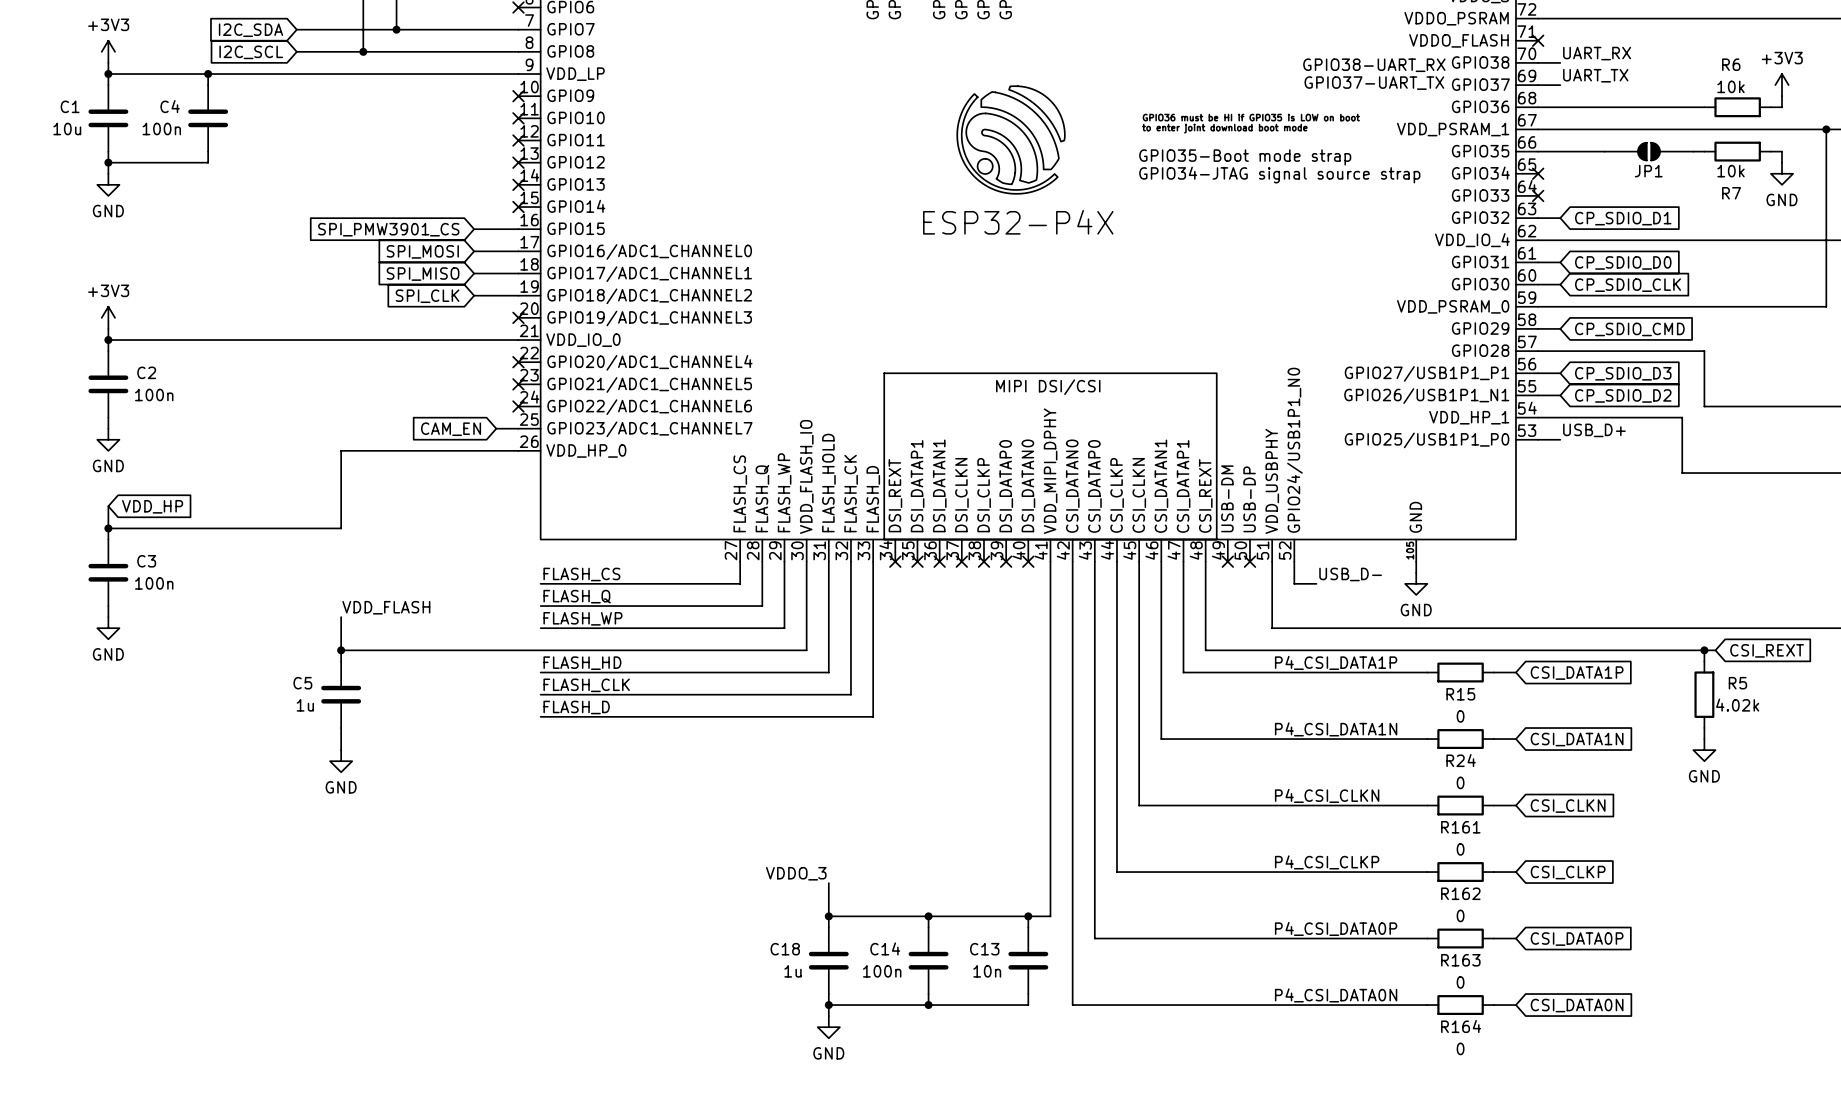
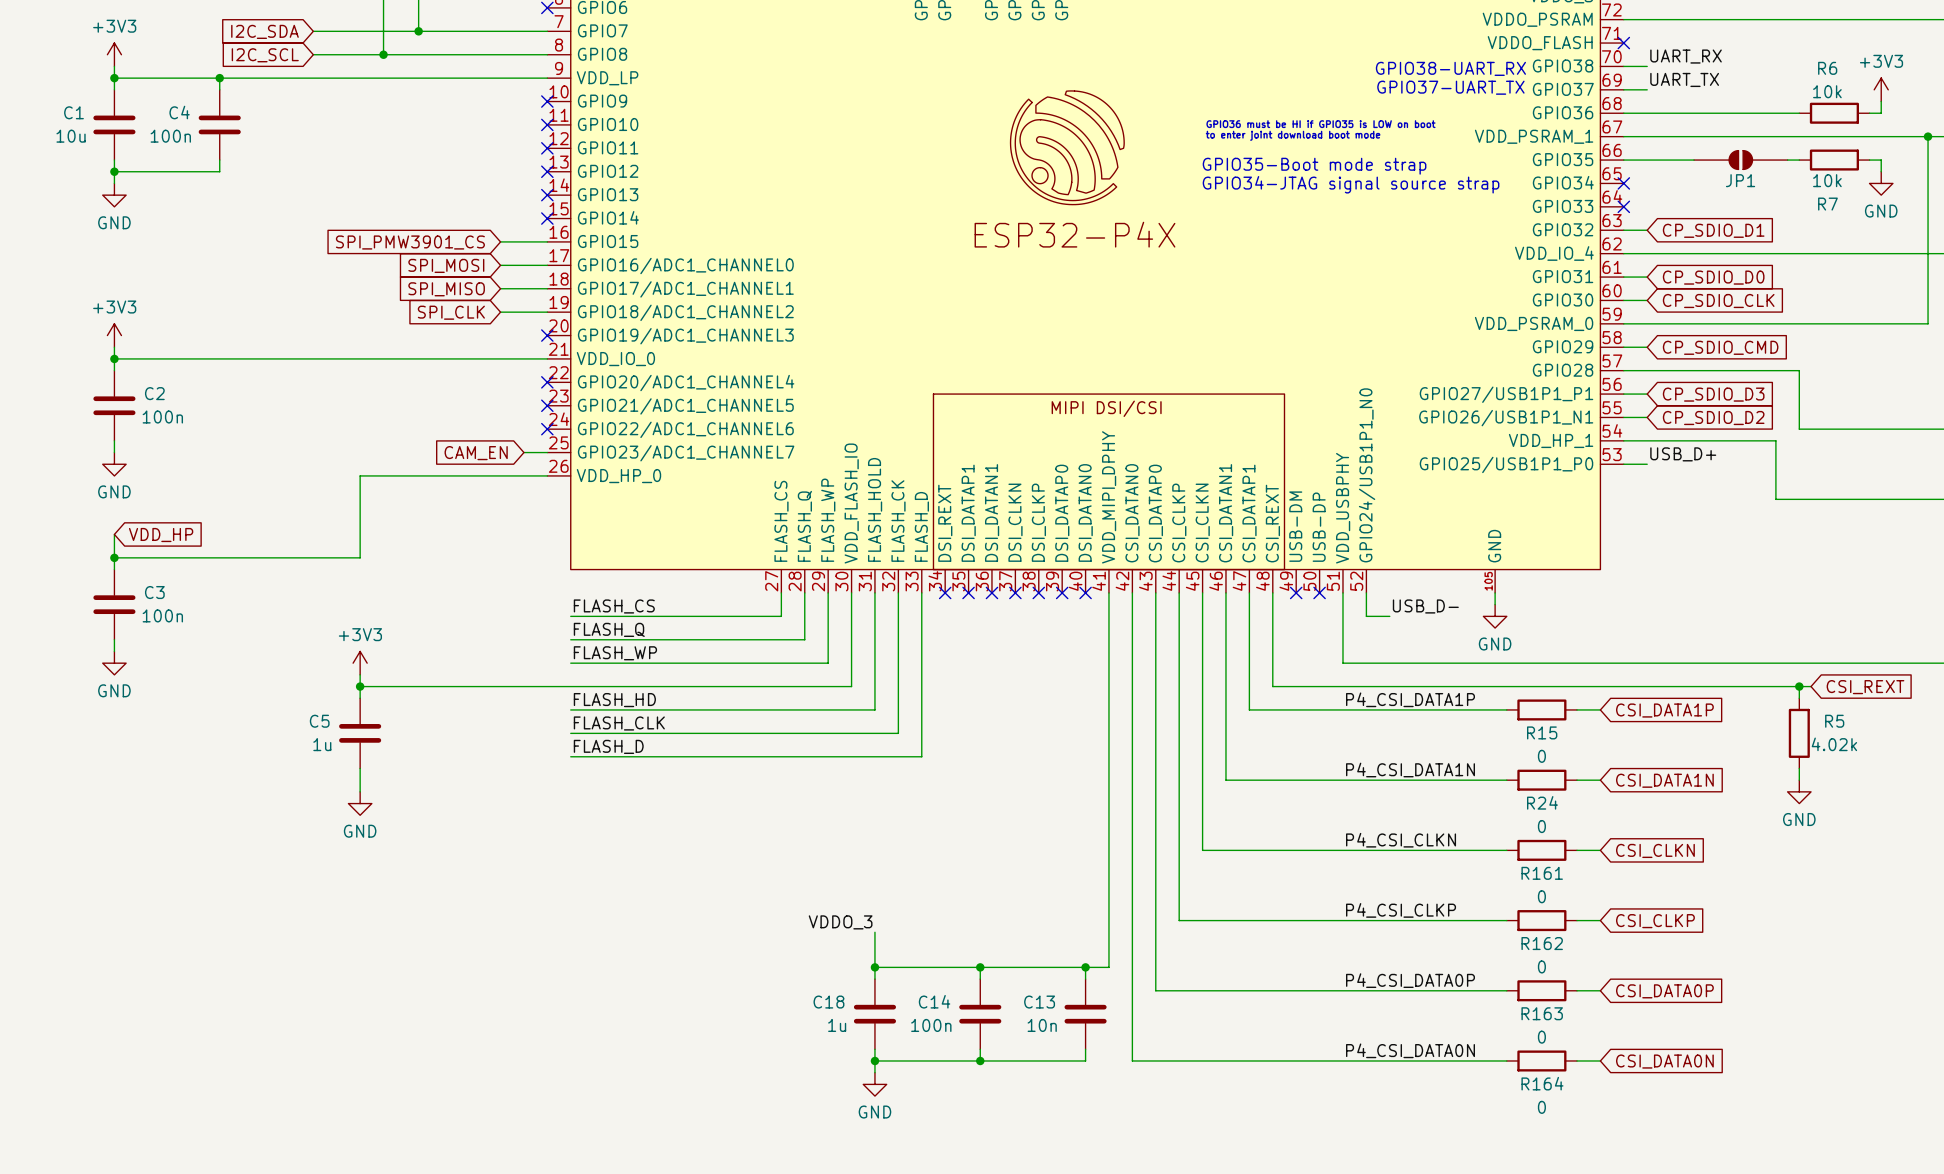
label: VDD_FLASH (386, 607) -> none
power symbol: none -> +3V3 (360, 663)

